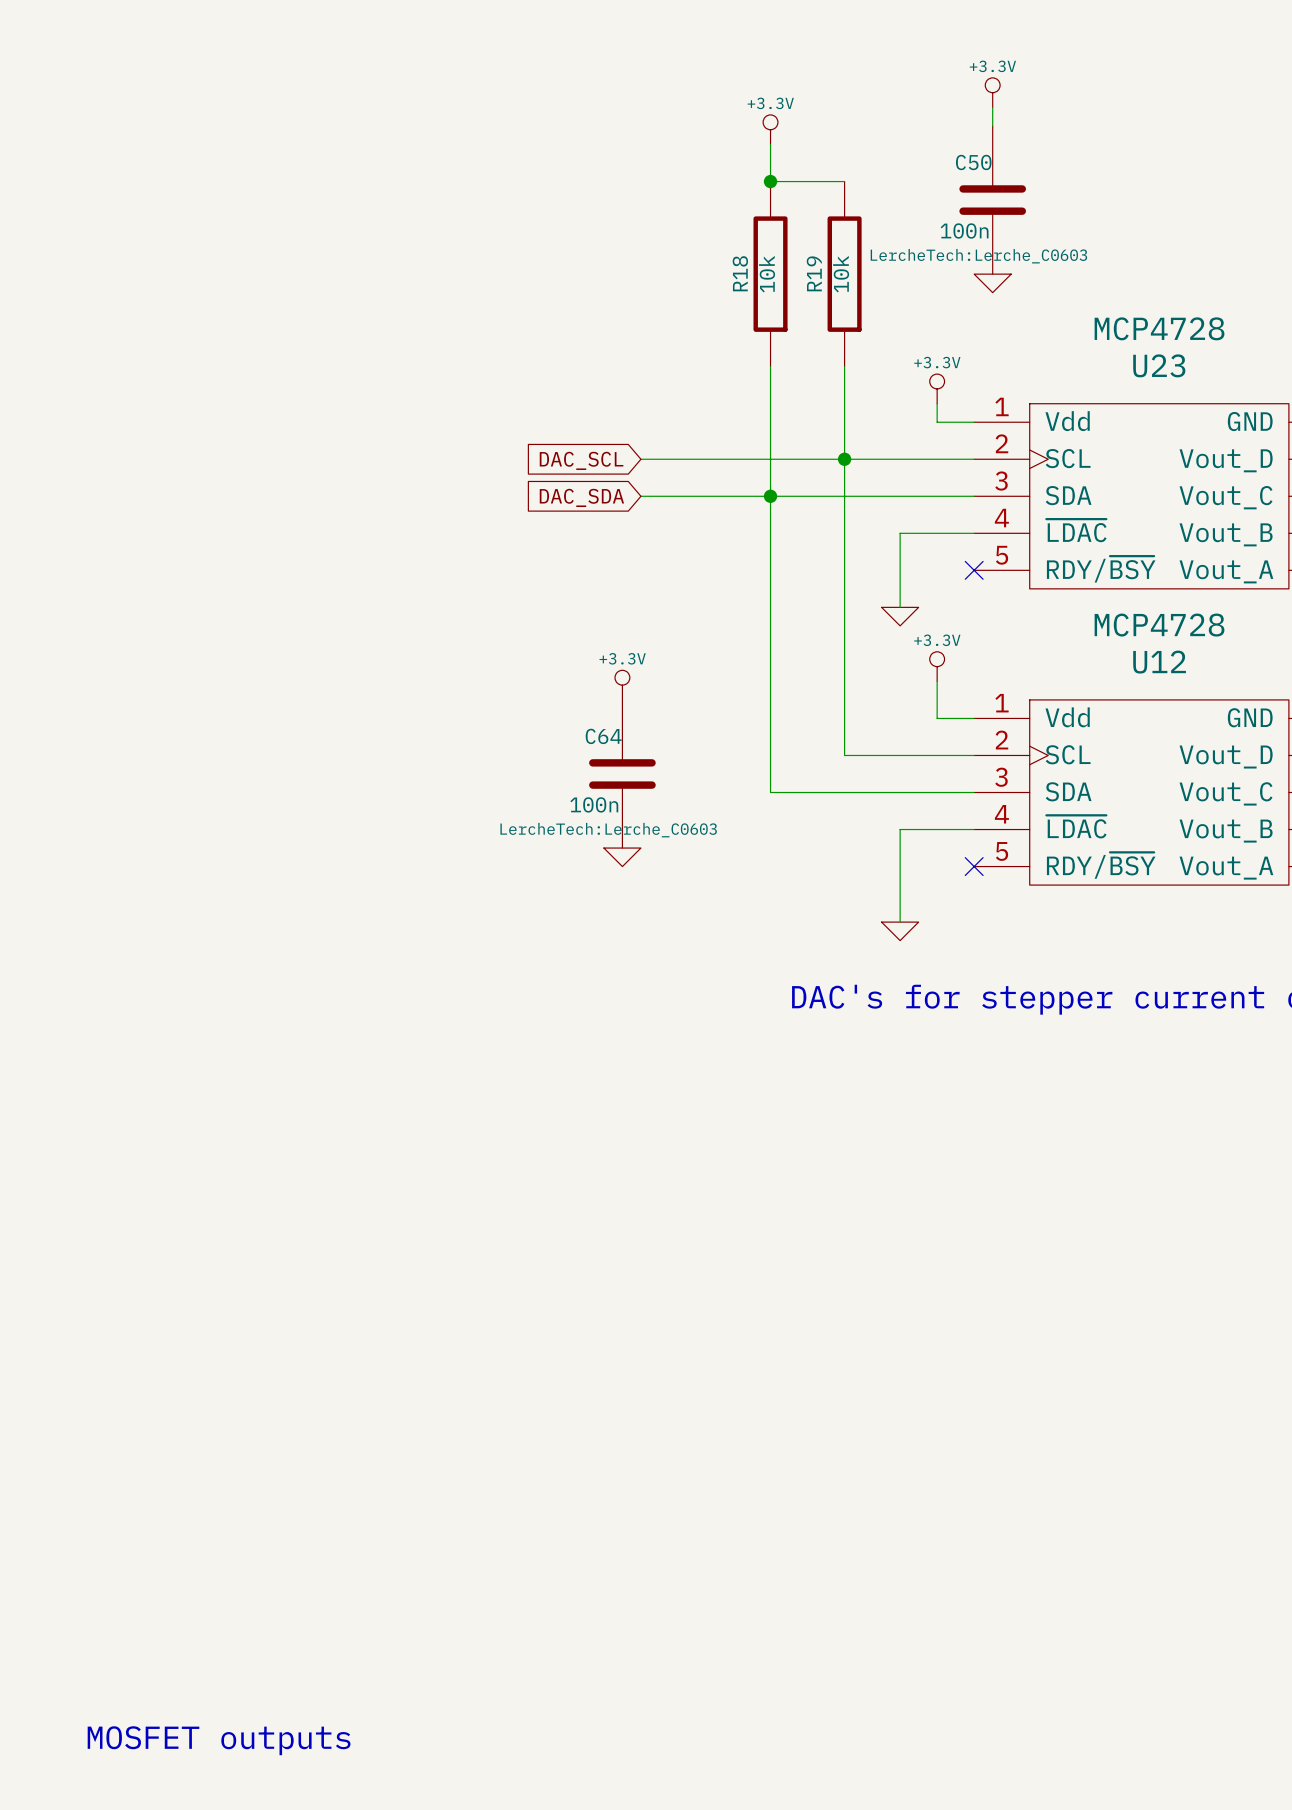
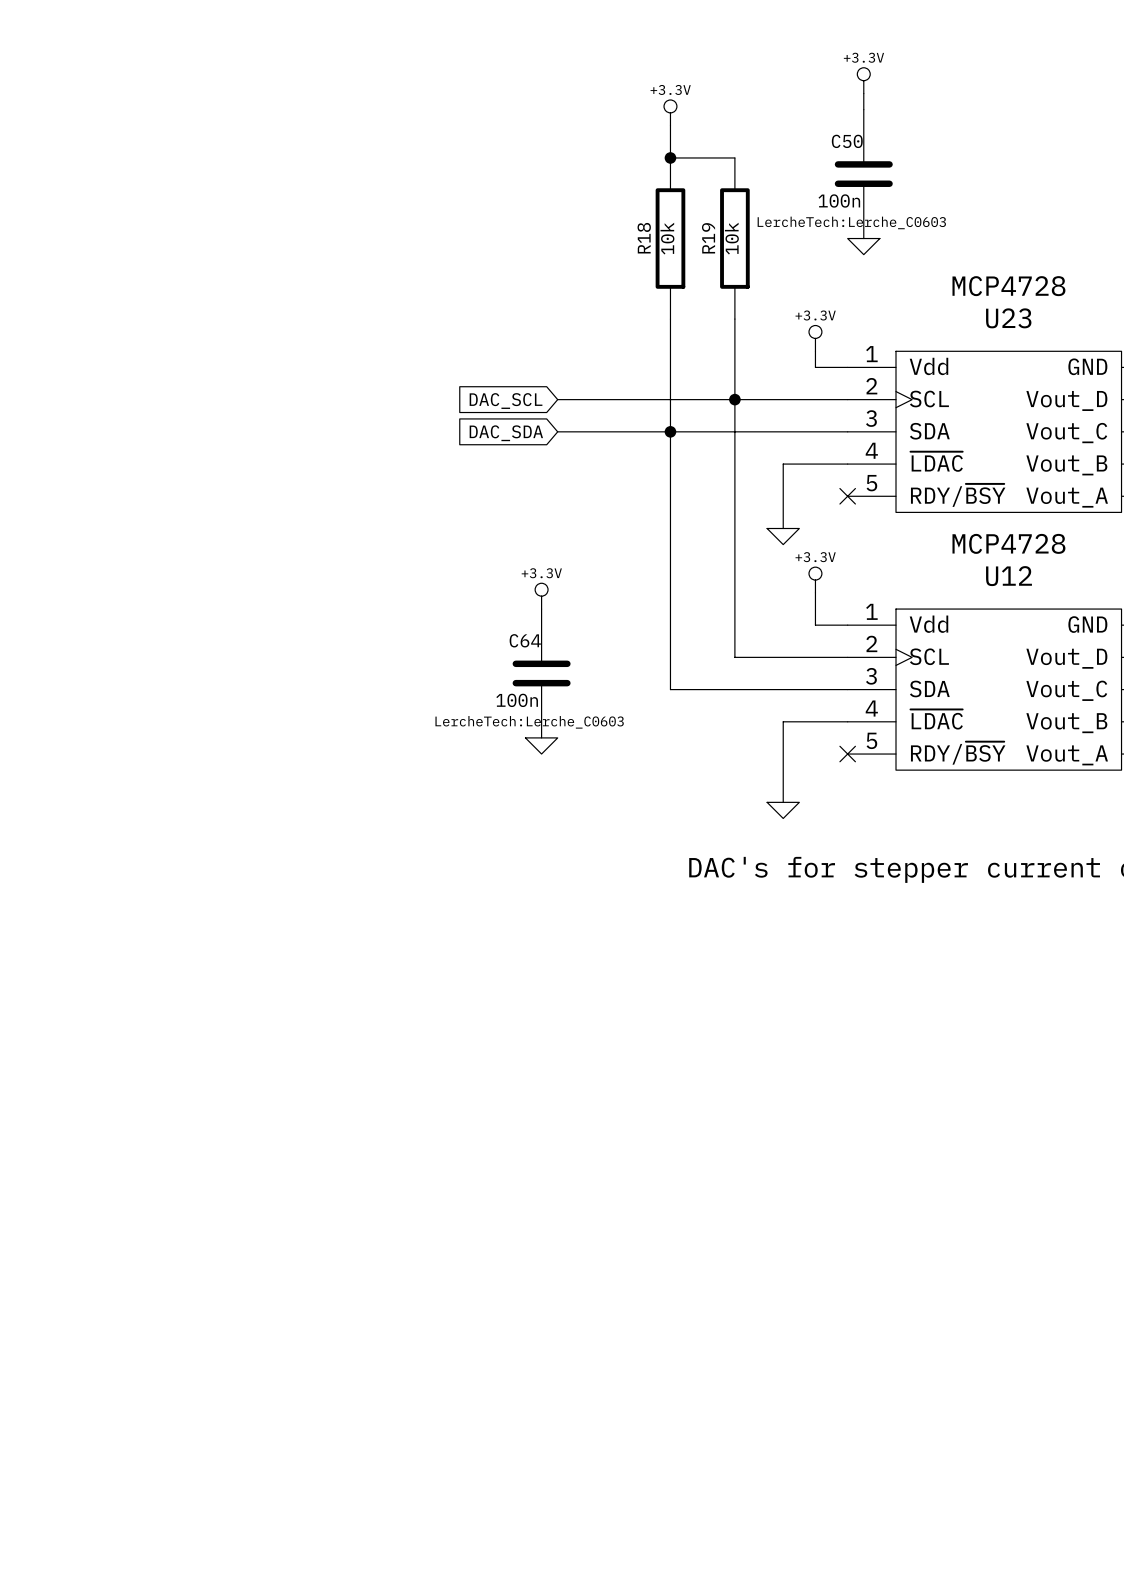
text: MOSFET outputs (219, 1740) -> none

